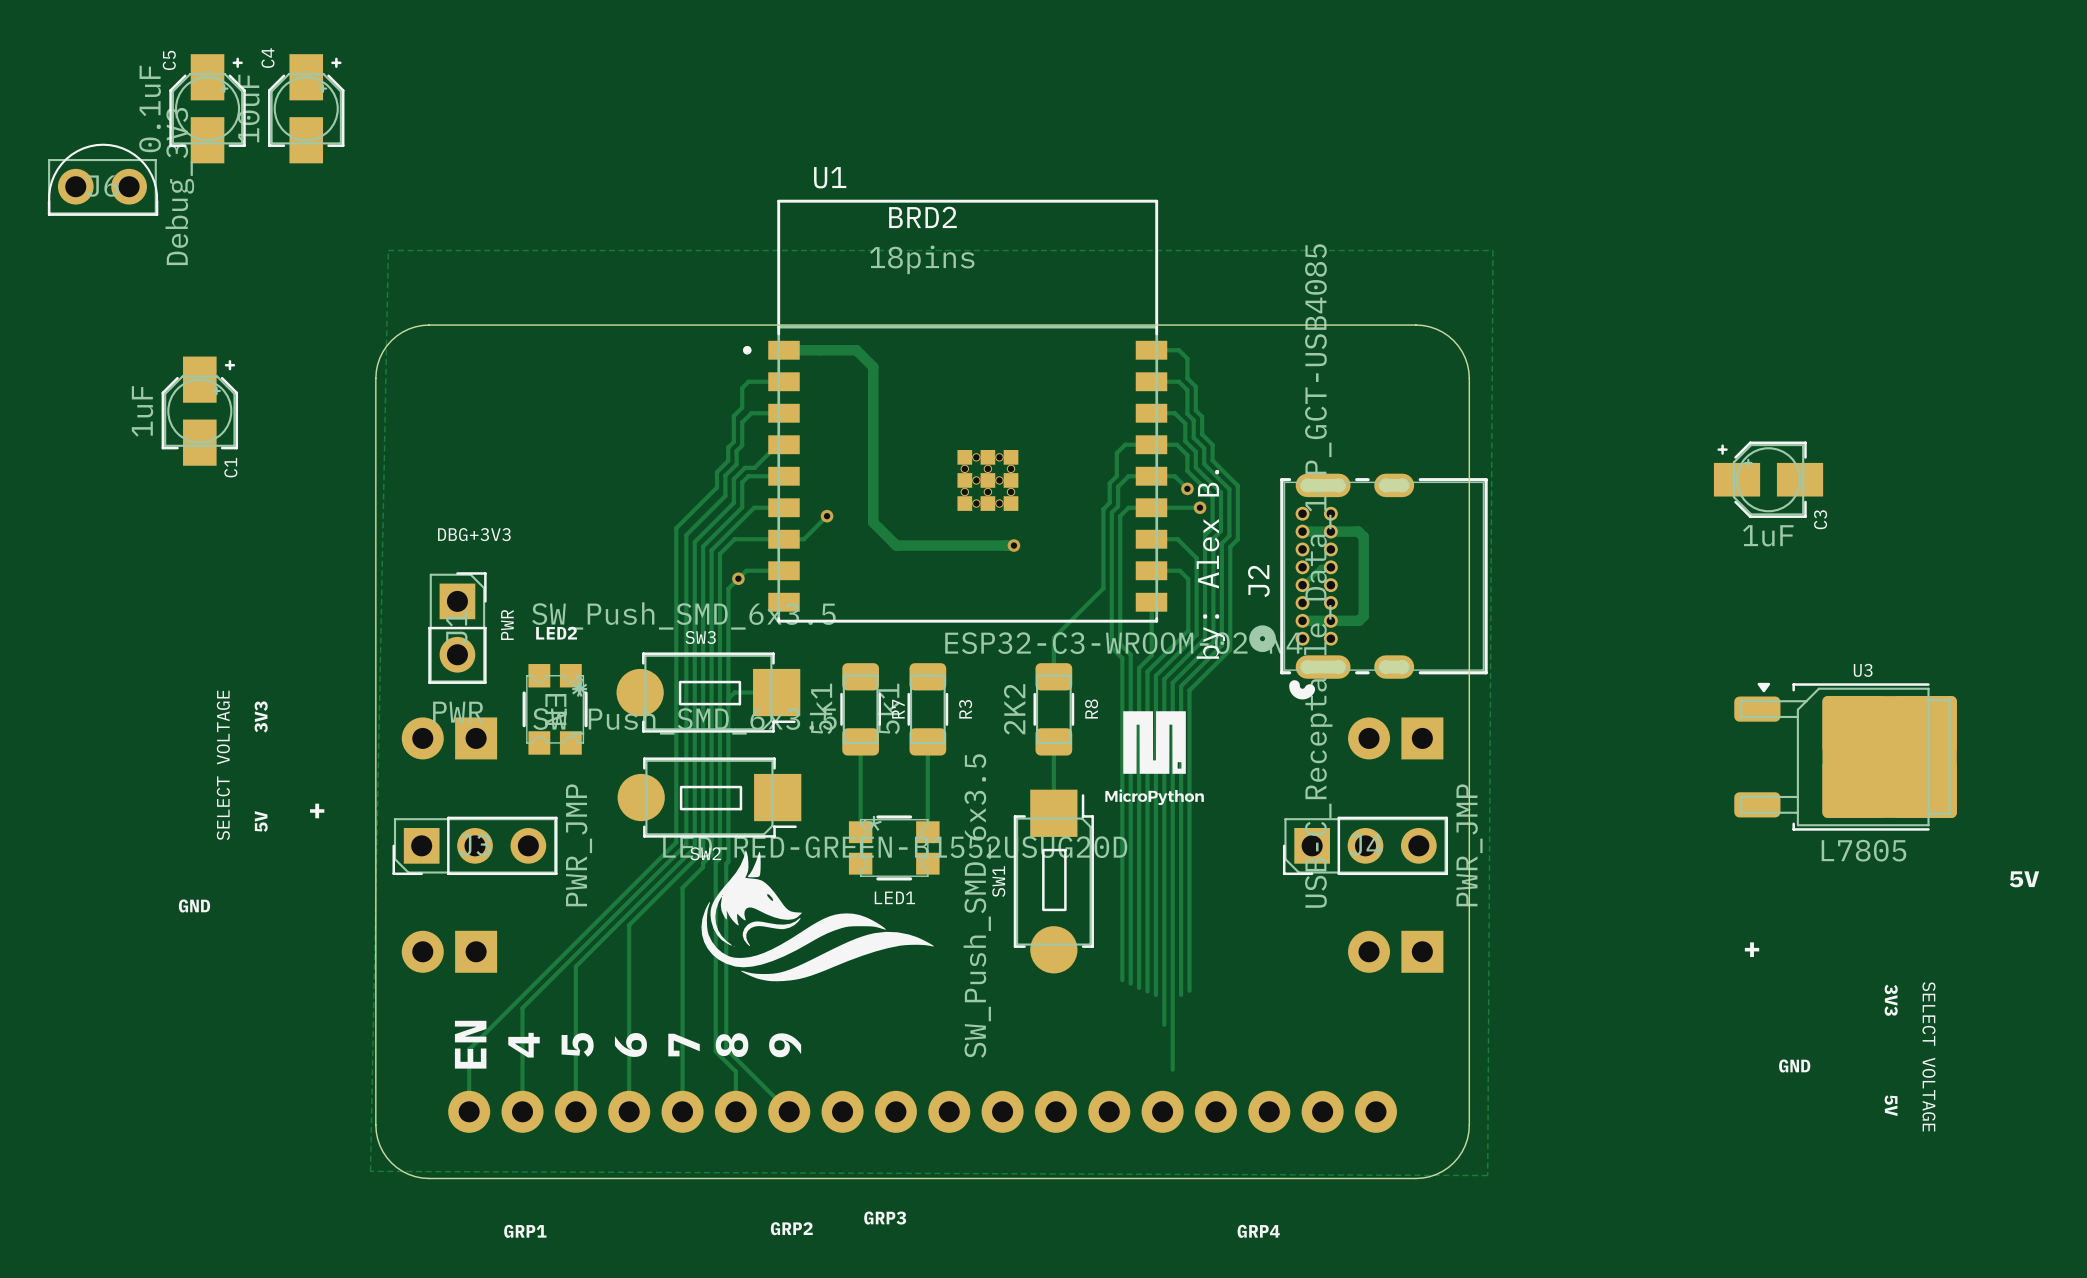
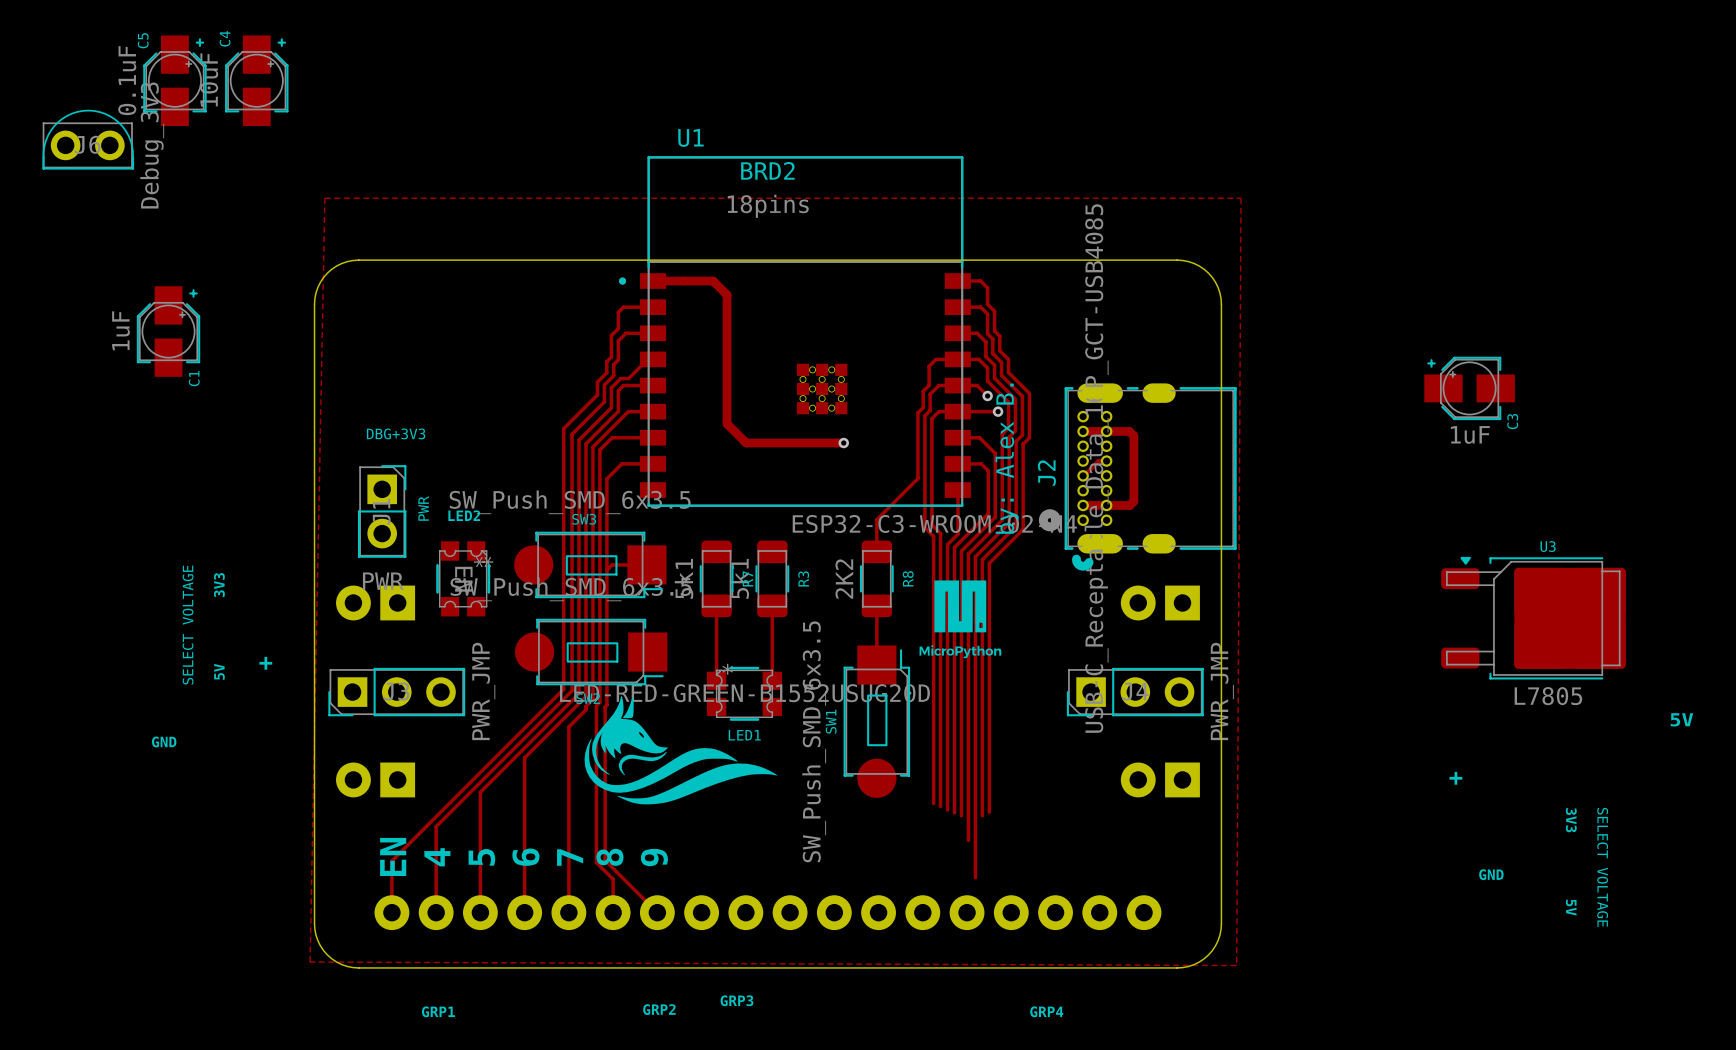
track: (827, 516) (803, 539) (784, 539) -> none
via: (827, 516) -> none
via: (738, 578) -> none

